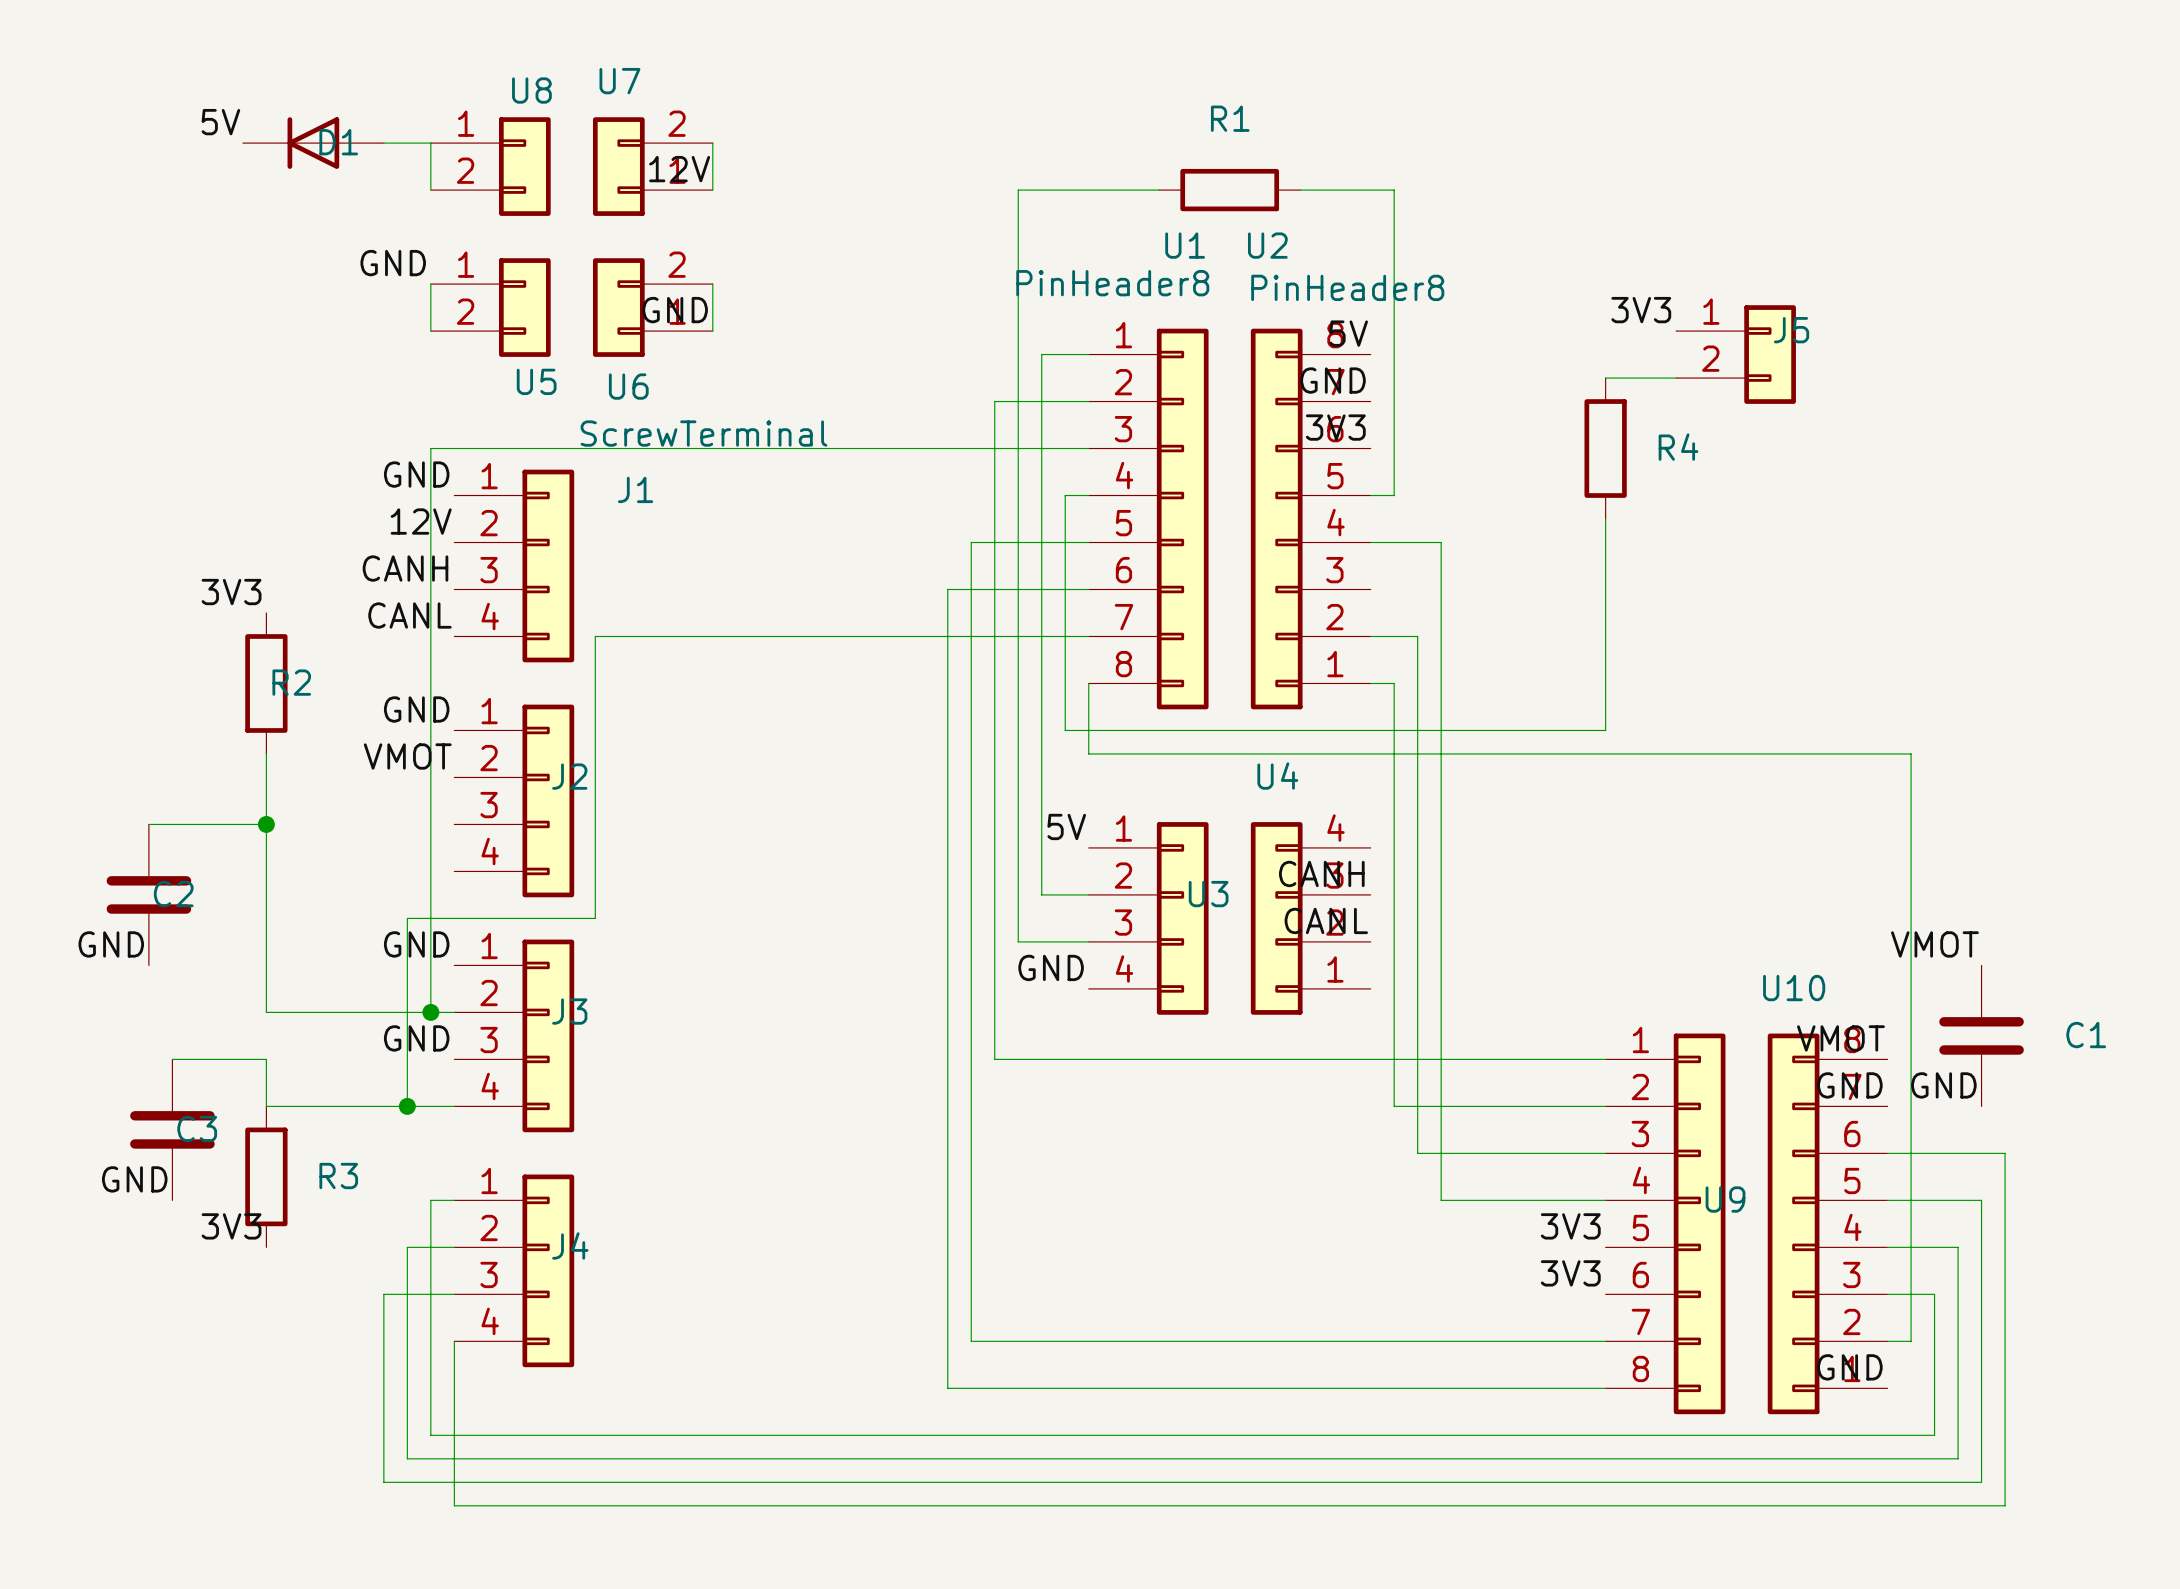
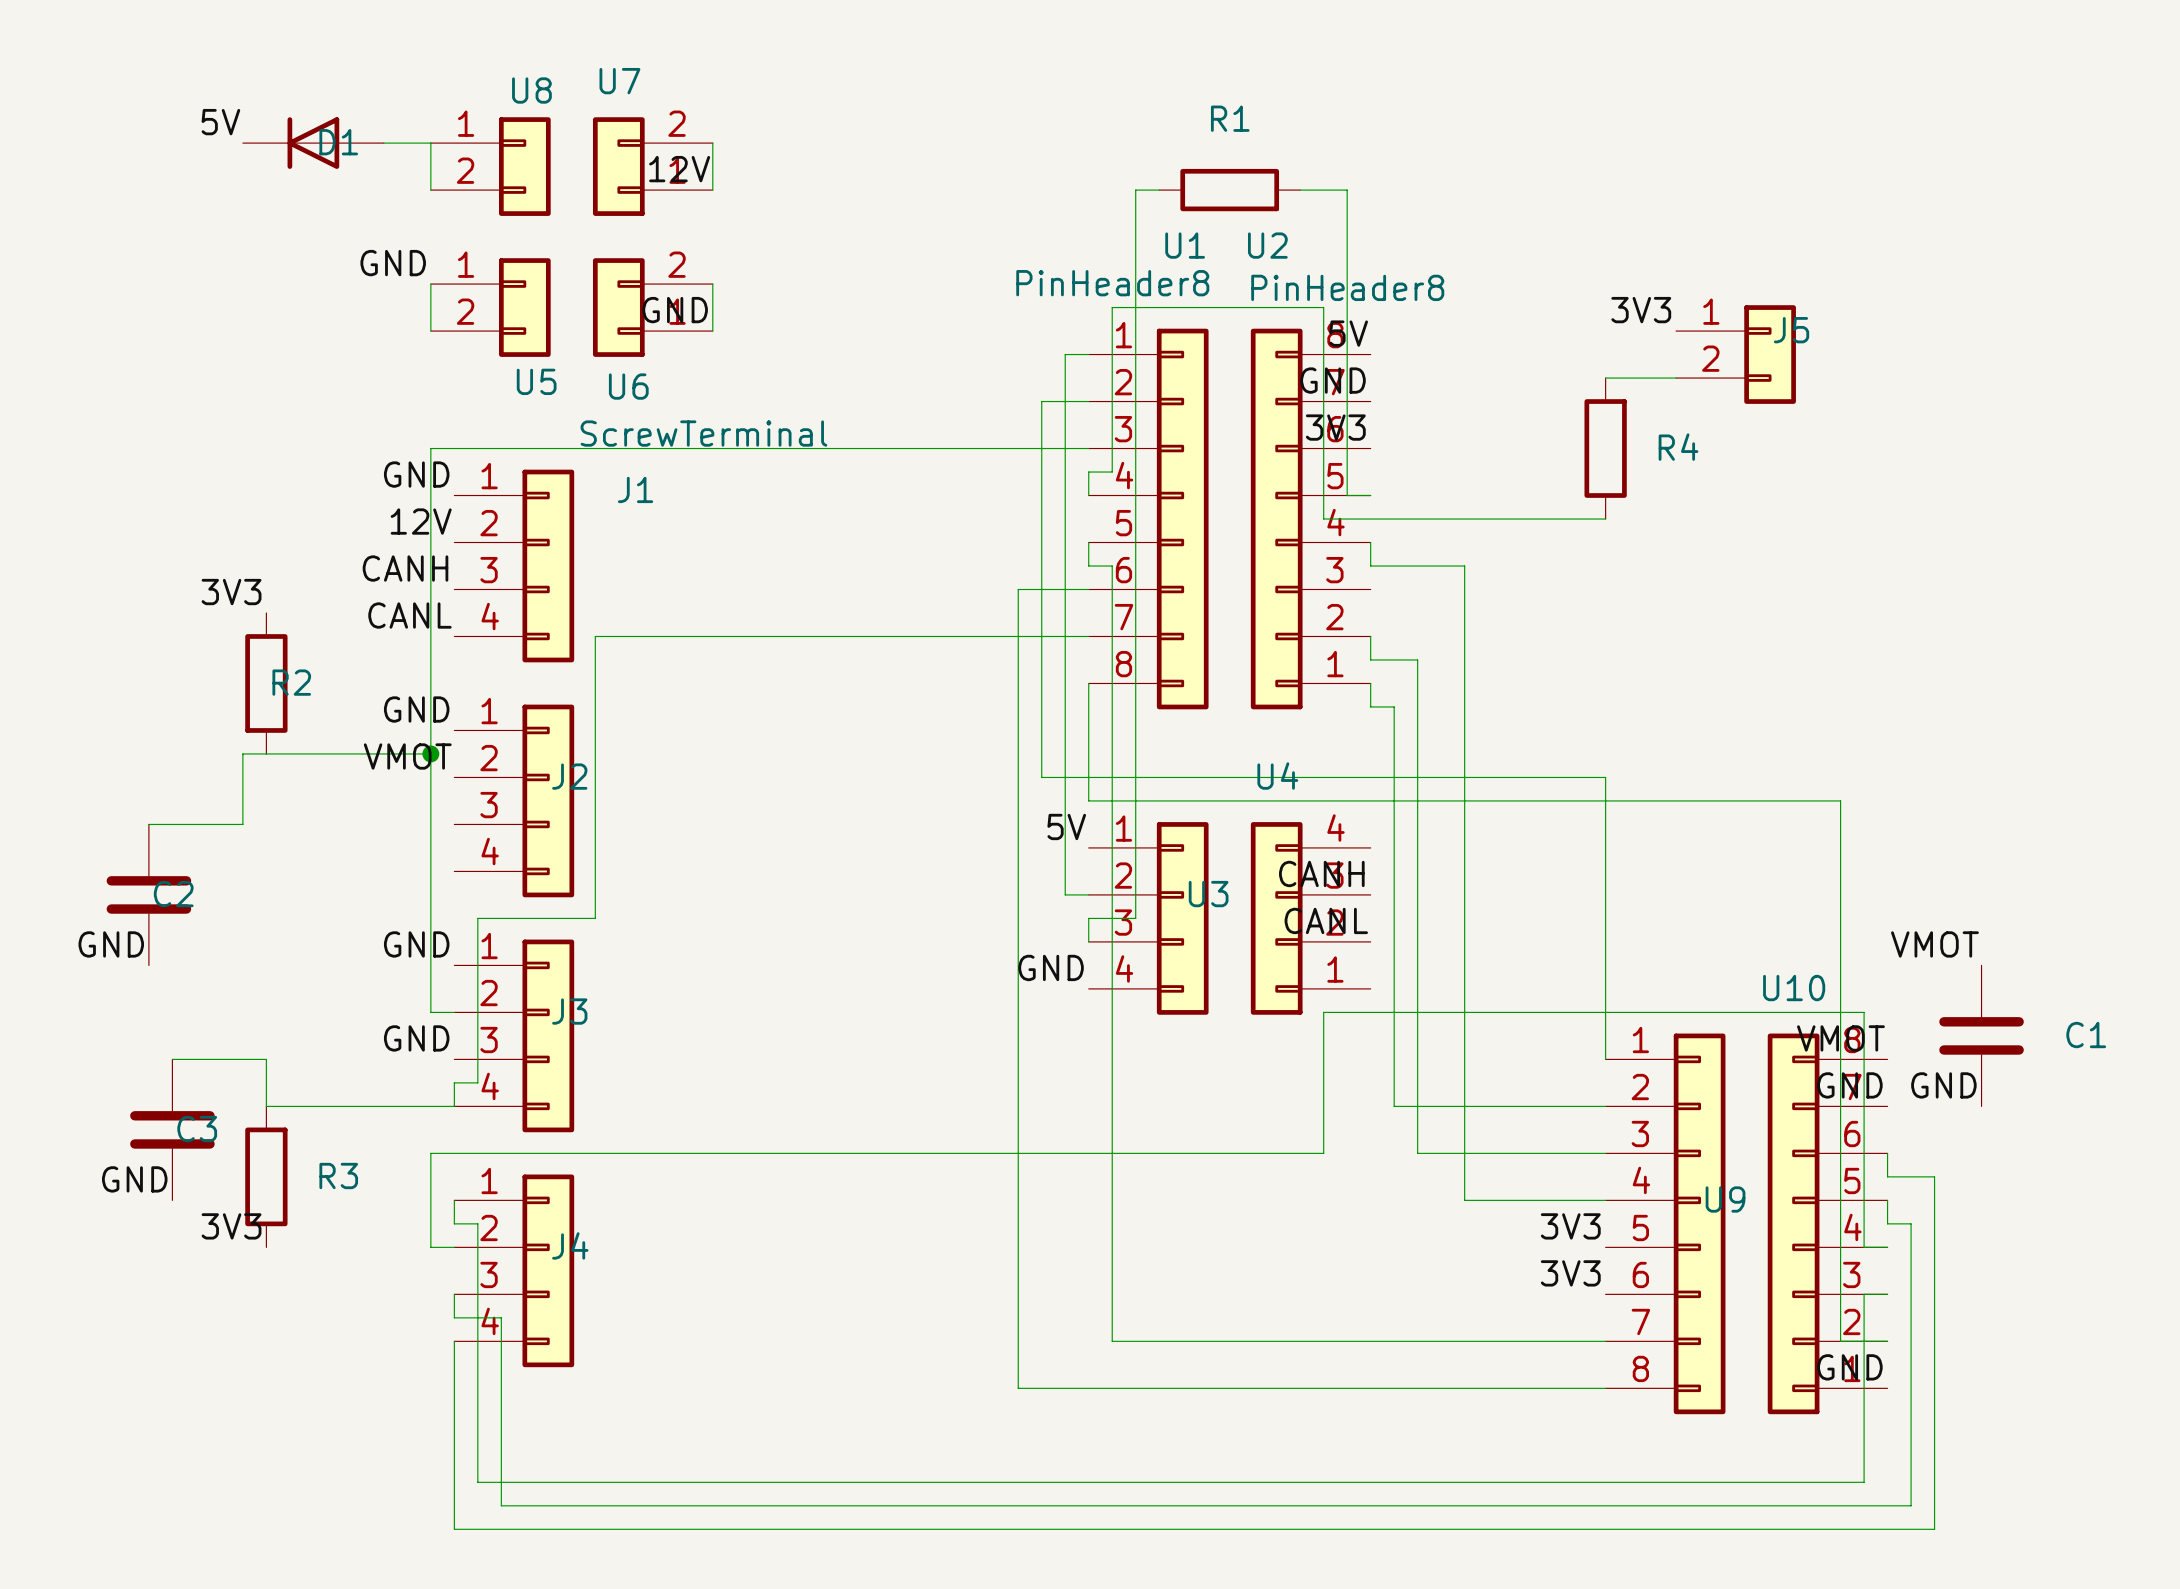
wire: (1135, 190) (1018, 190) (1018, 589) (947, 589) (947, 1388) (1018, 1388) -> (1135, 190) (1135, 918) (1088, 918) (1088, 941)
wire: (1347, 190) (1394, 190) (1394, 495) (1370, 495) -> (1347, 190) (1347, 495) (1370, 495)
wire: (1065, 354) (1041, 354) (1041, 401) (994, 401) (994, 1059) (1605, 1059) -> (1041, 777) (1605, 777) (1605, 1059)
wire: (1065, 495) (1088, 495) -> (1065, 495) (1065, 354)
wire: (1605, 519) (1605, 730) (1065, 730) -> (1605, 519) (1323, 519) (1323, 307) (1112, 307) (1112, 472) (1088, 472) (1088, 495)
wire: (1088, 542) (971, 542) (971, 1341) (1112, 1341) -> (1088, 542) (1088, 566) (1112, 566) (1112, 1341)
wire: (1370, 542) (1441, 542) (1441, 1200) (1464, 1200) -> (1370, 542) (1370, 566) (1464, 566) (1464, 1200)
wire: (1370, 636) (1417, 636) (1417, 659) -> (1370, 636) (1370, 659) (1417, 659)
wire: (1370, 683) (1394, 683) (1394, 706) -> (1370, 683) (1370, 706) (1394, 706)
wire: (266, 753) (266, 1012) (430, 1012) -> none
junction: none -> (430, 753)
wire: (1088, 753) (1911, 753) (1911, 1223) -> (1088, 753) (1088, 800) (1840, 800) (1840, 1341) (1887, 1341)
wire: (1041, 777) (1041, 894) (1065, 894) -> (1065, 730) (1065, 894)
wire: (242, 824) (266, 824) -> (242, 824) (242, 753) (430, 753)
junction: (266, 824) -> none
wire: (477, 918) (407, 918) (407, 1106) -> (477, 918) (477, 1082) (454, 1082) (454, 1106)
wire: (1018, 941) (1088, 941) -> (1018, 941) (1018, 1388)
junction: (430, 1012) -> none
junction: (407, 1106) -> none
wire: (1887, 1153) (2005, 1153) (2005, 1505) (1911, 1505) -> none
wire: (430, 1200) (454, 1200) -> (477, 1482) (477, 1223) (454, 1223) (454, 1200)
wire: (1887, 1200) (1981, 1200) (1981, 1482) (1864, 1482) -> (1887, 1294) (1864, 1294) (1864, 1482)
wire: none -> (1887, 1200) (1887, 1223) (1911, 1223)
wire: (1887, 1247) (1958, 1247) (1958, 1458) (407, 1458) (407, 1247) (430, 1247) (430, 1435) (1934, 1435) -> (1887, 1247) (1864, 1247) (1864, 1012) (1323, 1012) (1323, 1153) (430, 1153) (430, 1200)
wire: (454, 1294) (383, 1294) (383, 1482) (477, 1482) -> (454, 1294) (454, 1317) (501, 1317) (501, 1505)
wire: (1887, 1294) (1934, 1294) -> (1887, 1153) (1887, 1176) (1934, 1176) (1934, 1294)
wire: (1887, 1341) (1911, 1341) -> (1911, 1505) (1911, 1341)
wire: (454, 1505) (501, 1505) -> (454, 1505) (454, 1529) (1934, 1529) (1934, 1435)

